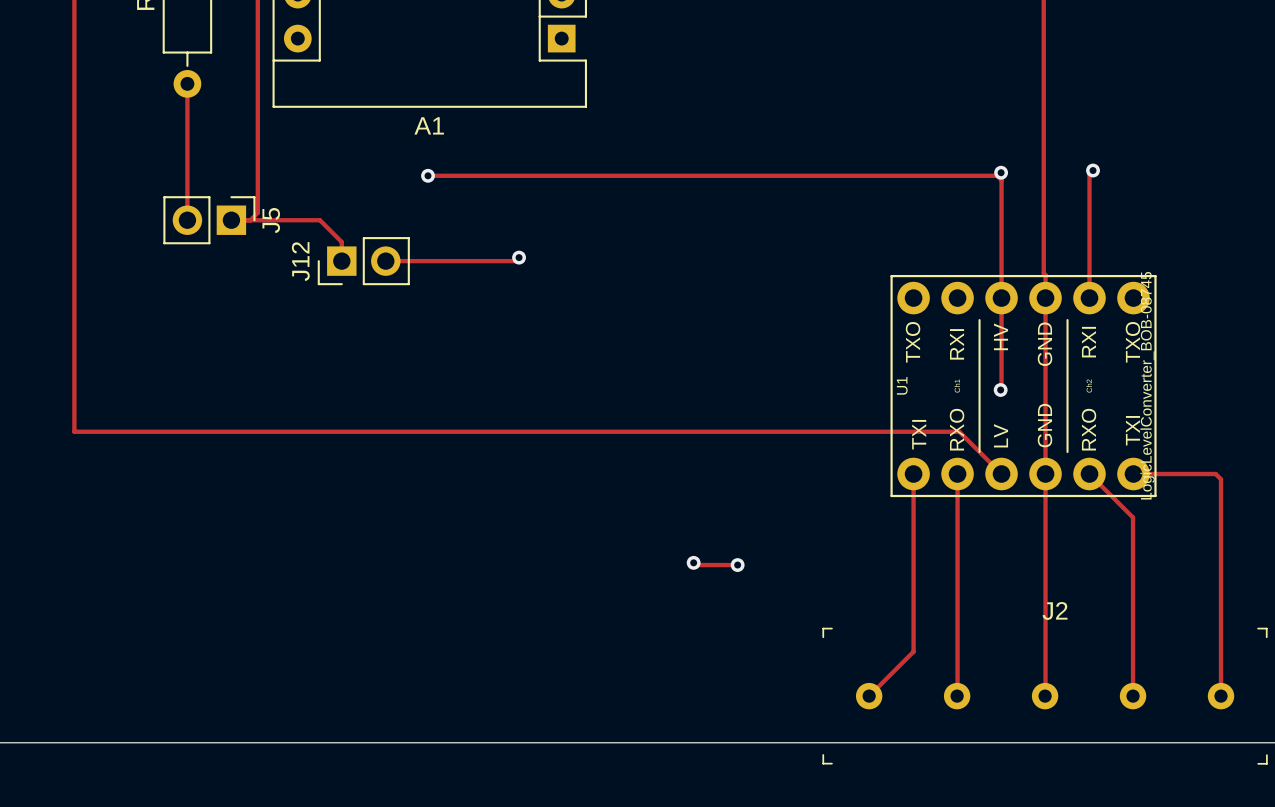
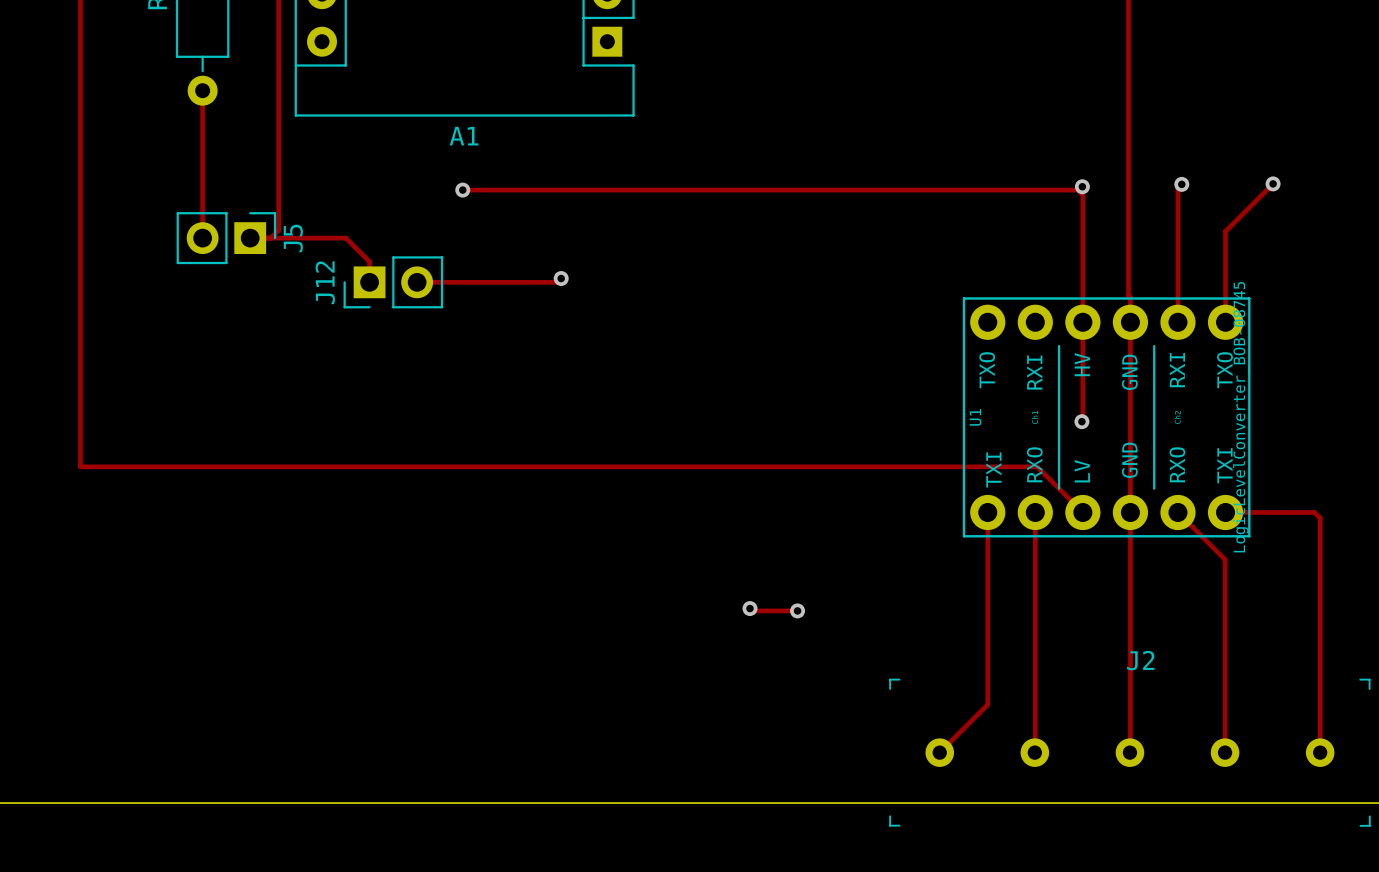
track: none -> (1273, 183) (1225, 231) (1225, 322)
via: none -> (1273, 183)

